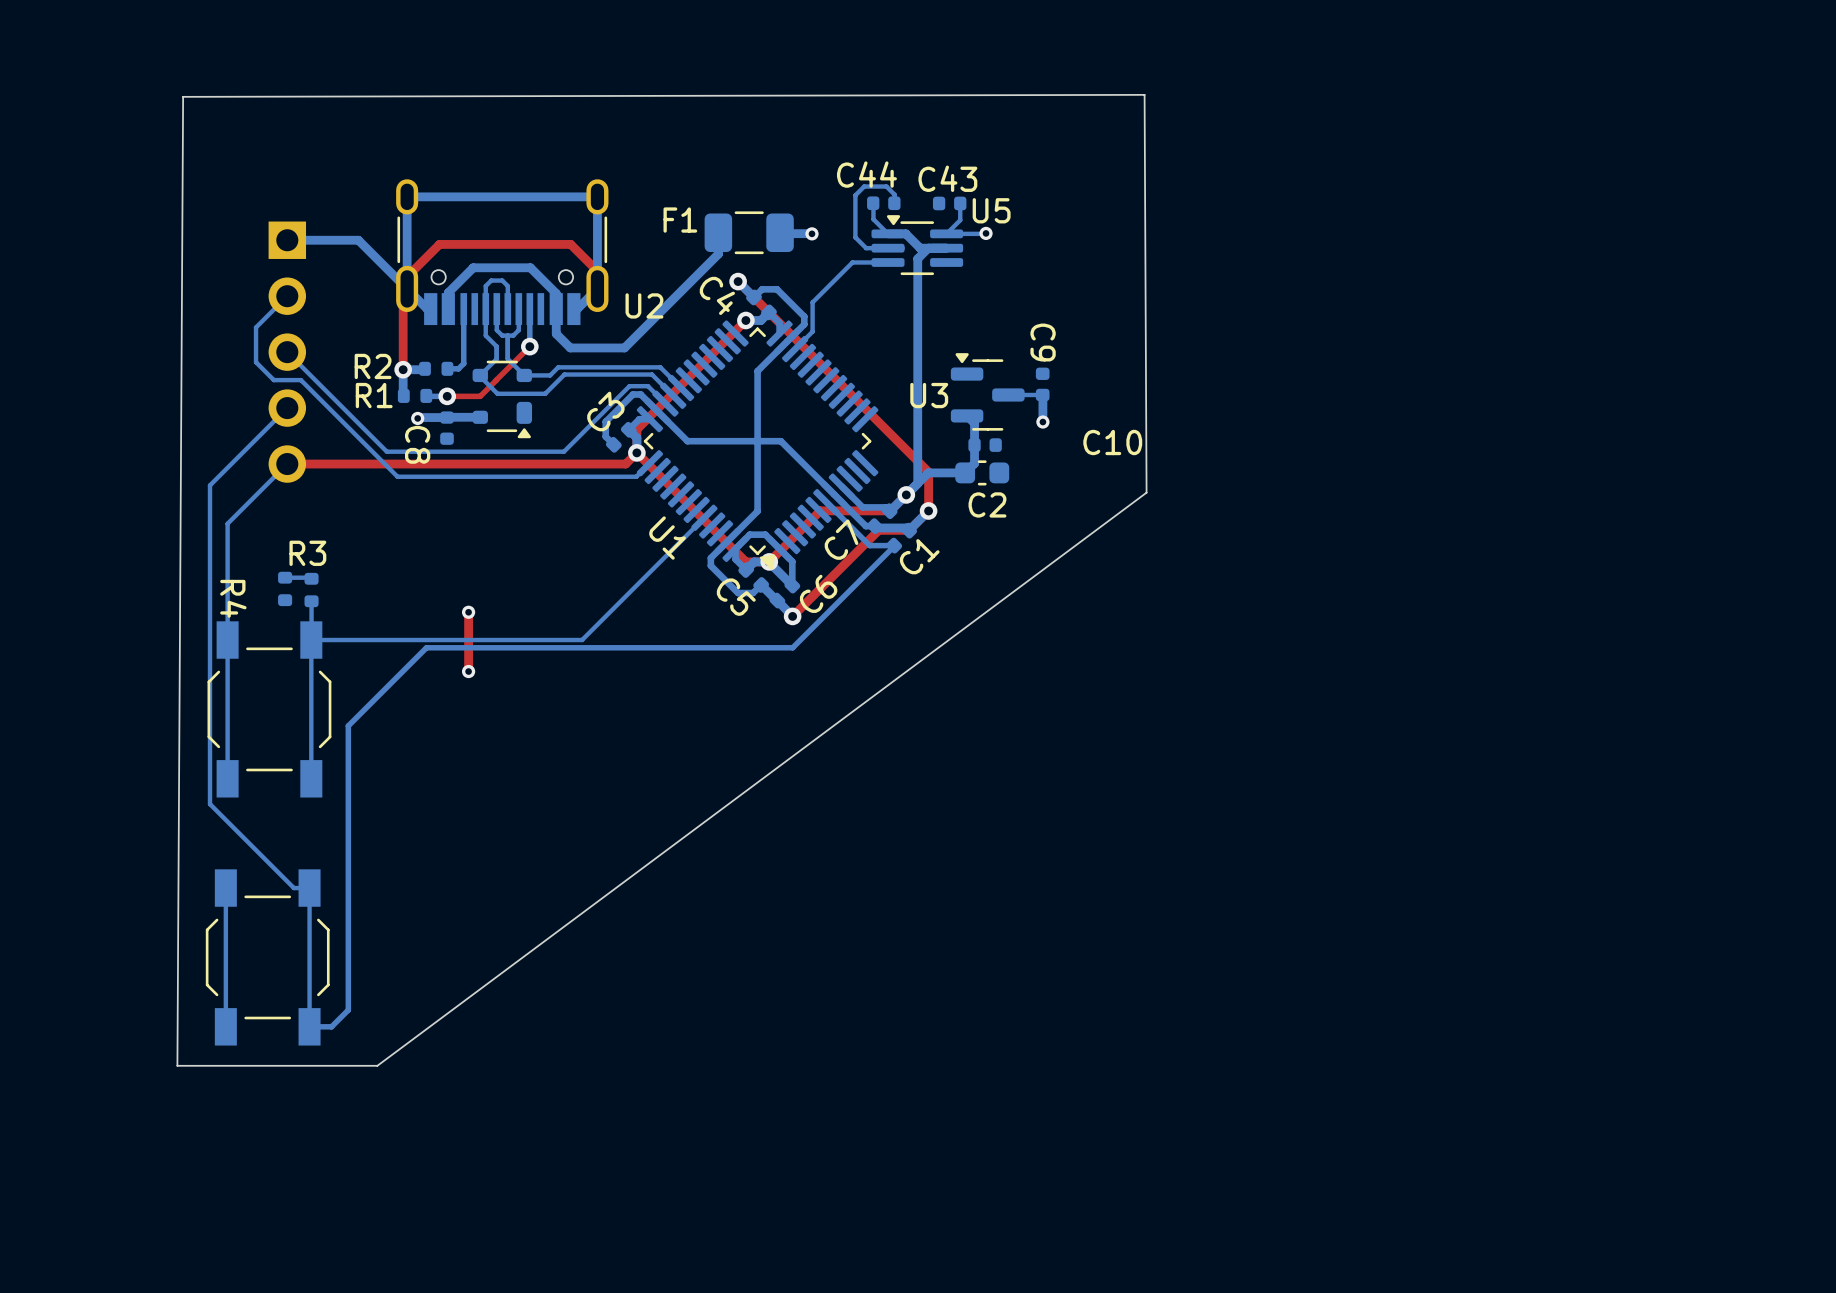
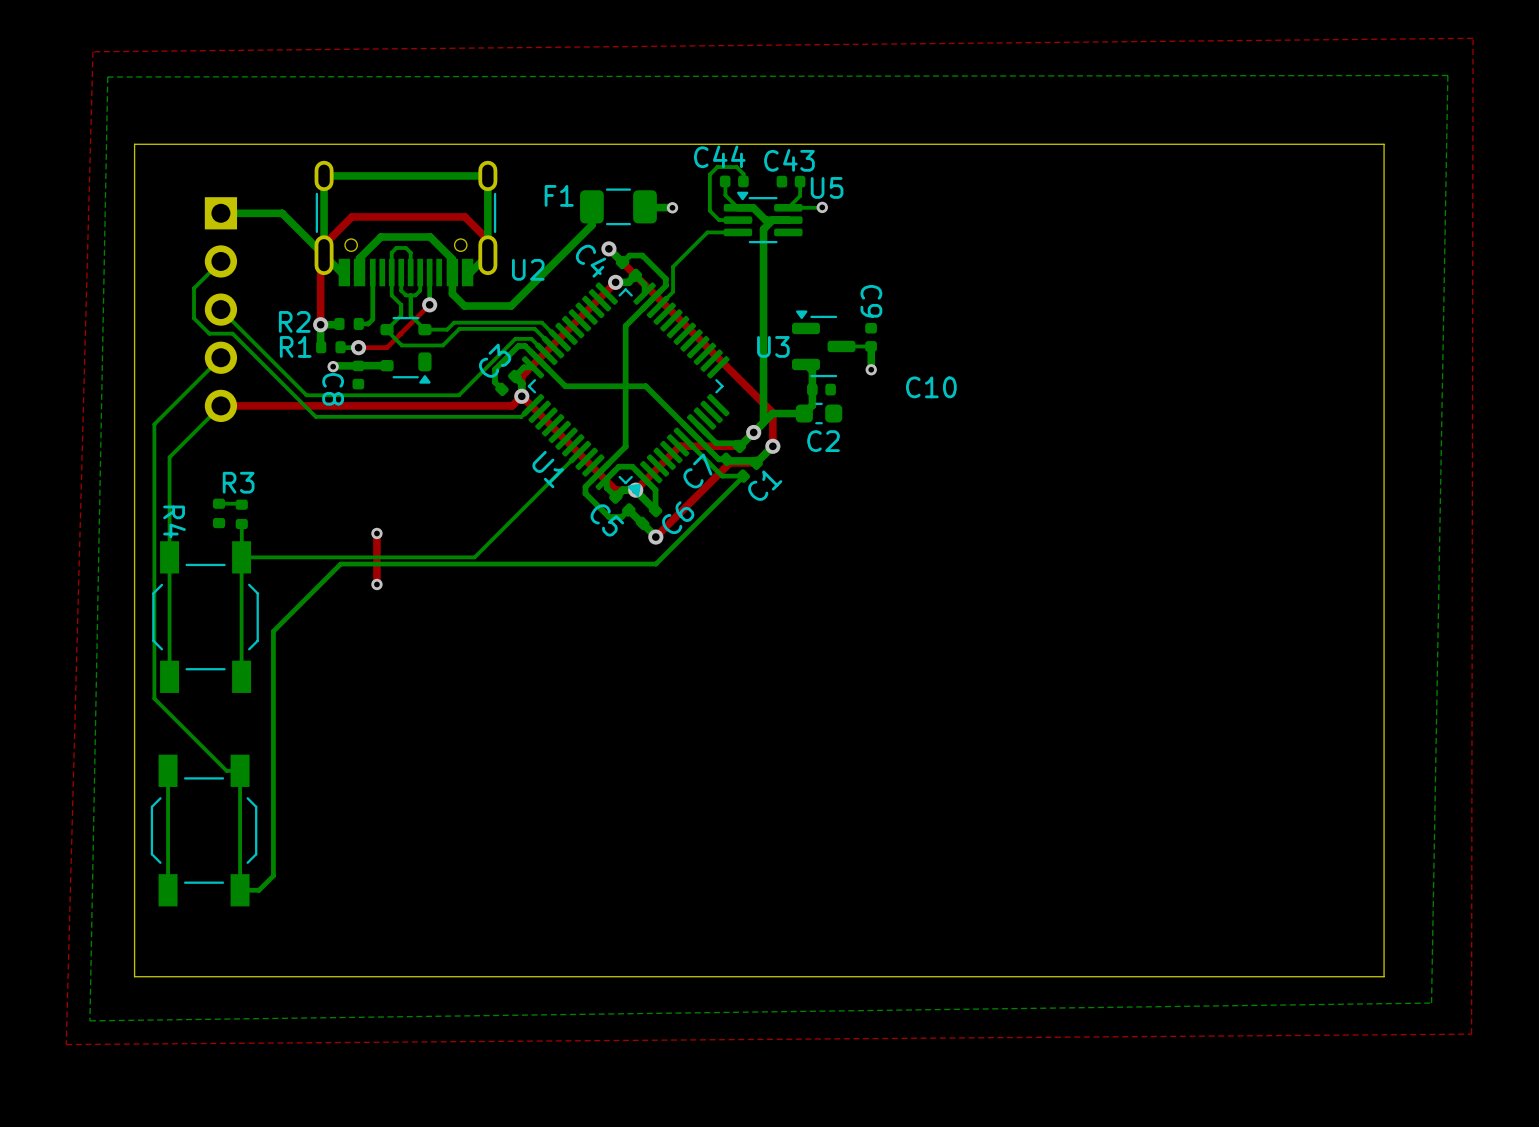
top zone outline: none -> (1473, 38) (92, 51) (66, 1044) (1471, 1034) (1473, 38)
bottom zone outline: none -> (1447, 75) (107, 76) (89, 1020) (1431, 1003) (1447, 75)
board edge: (1144, 94) (1146, 492) (377, 1065) (177, 1065) (183, 96) (1144, 94) -> (1384, 144) (1384, 976) (134, 976) (134, 144) (1384, 144)

